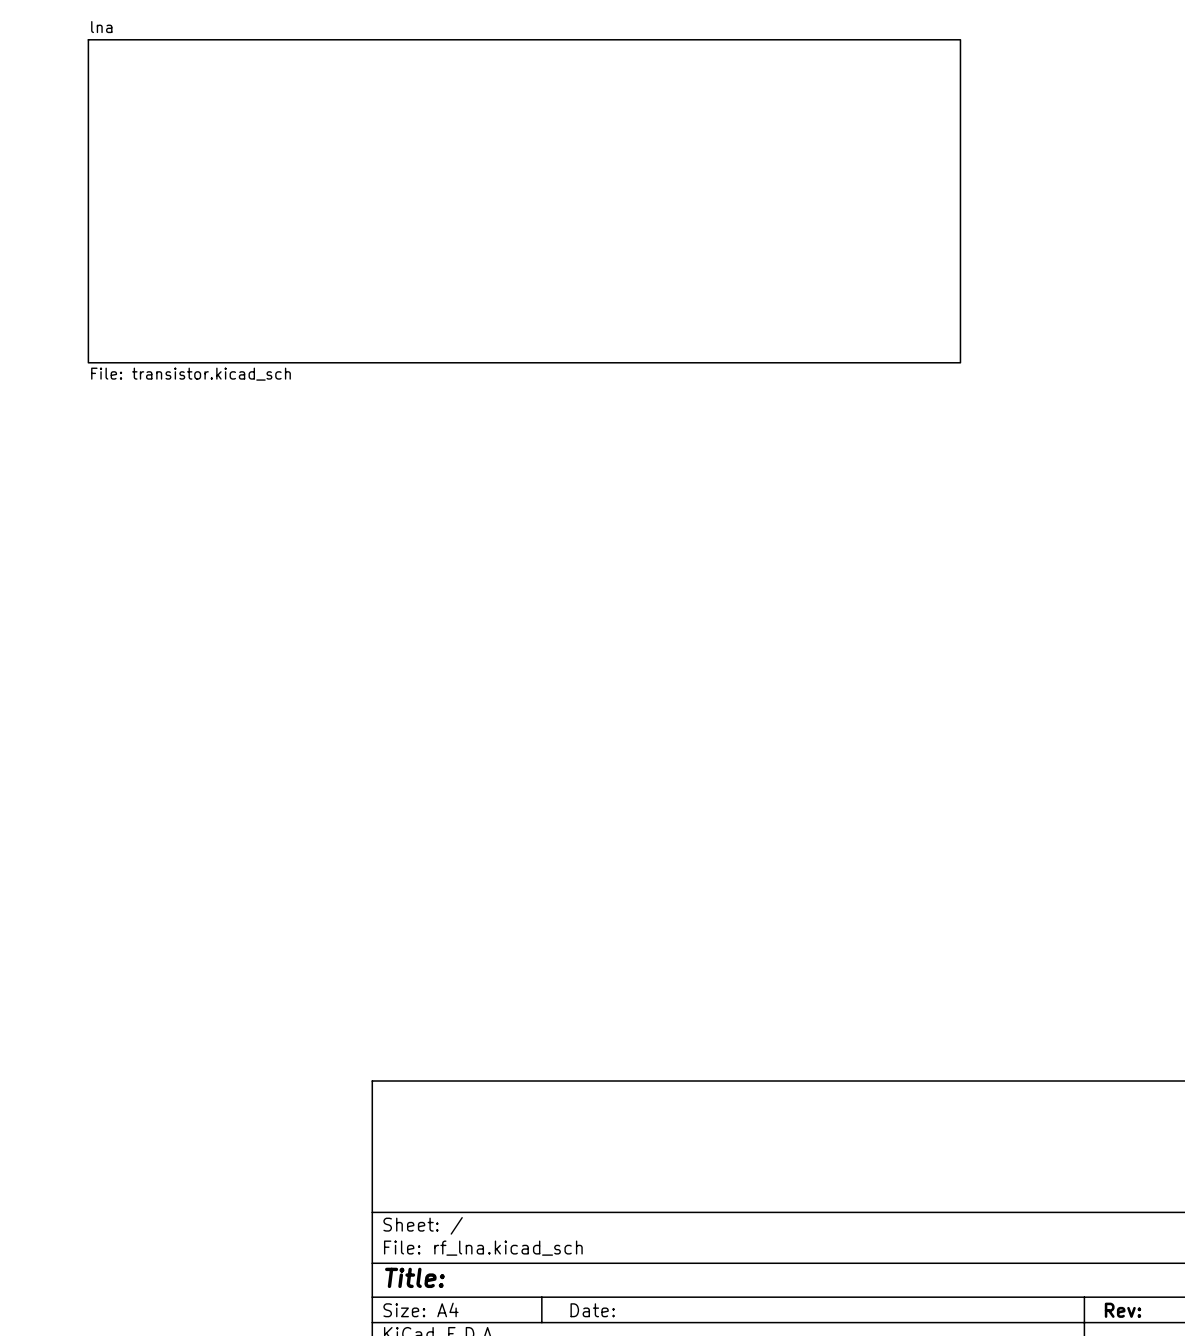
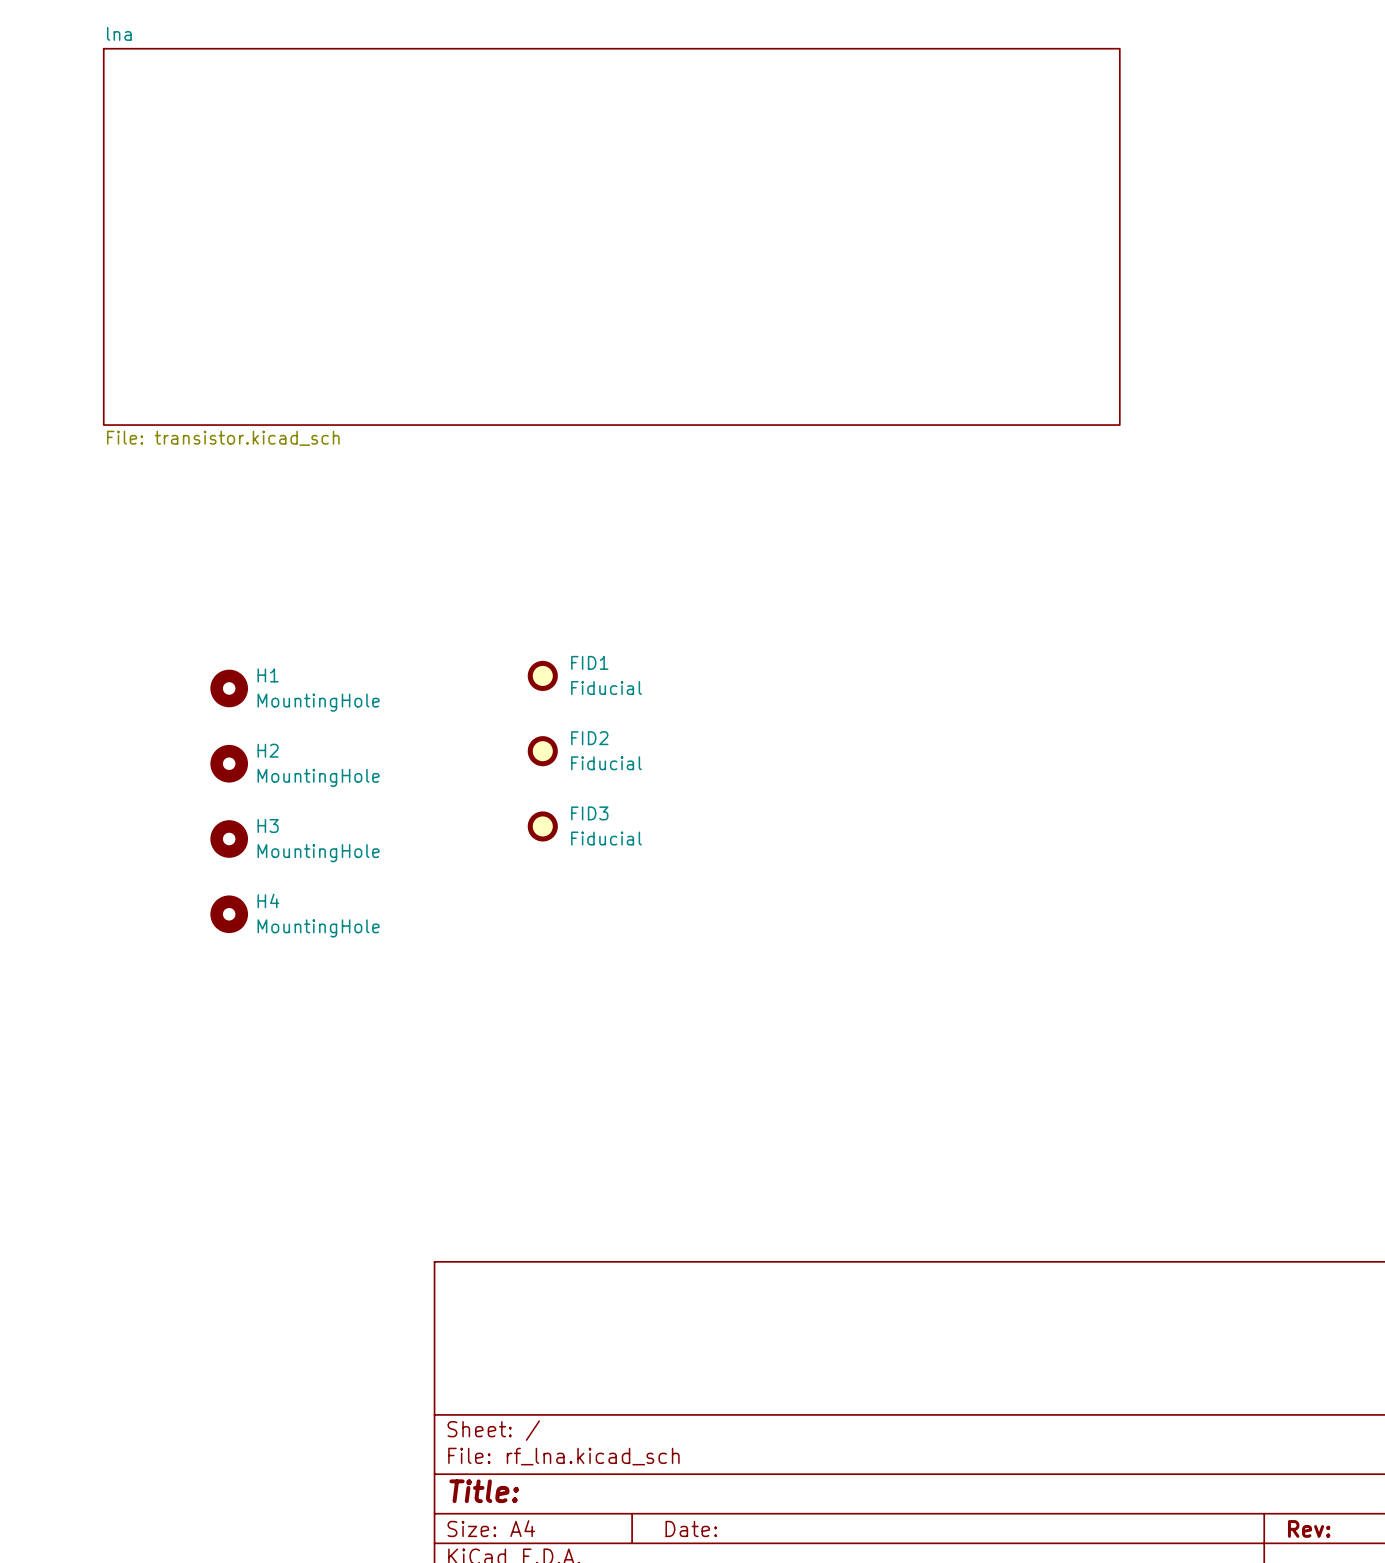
FID1: none -> Fiducial (542, 675)
H1: none -> MountingHole (229, 688)
FID2: none -> Fiducial (542, 751)
H2: none -> MountingHole (229, 763)
FID3: none -> Fiducial (542, 826)
H3: none -> MountingHole (229, 838)
H4: none -> MountingHole (229, 914)

